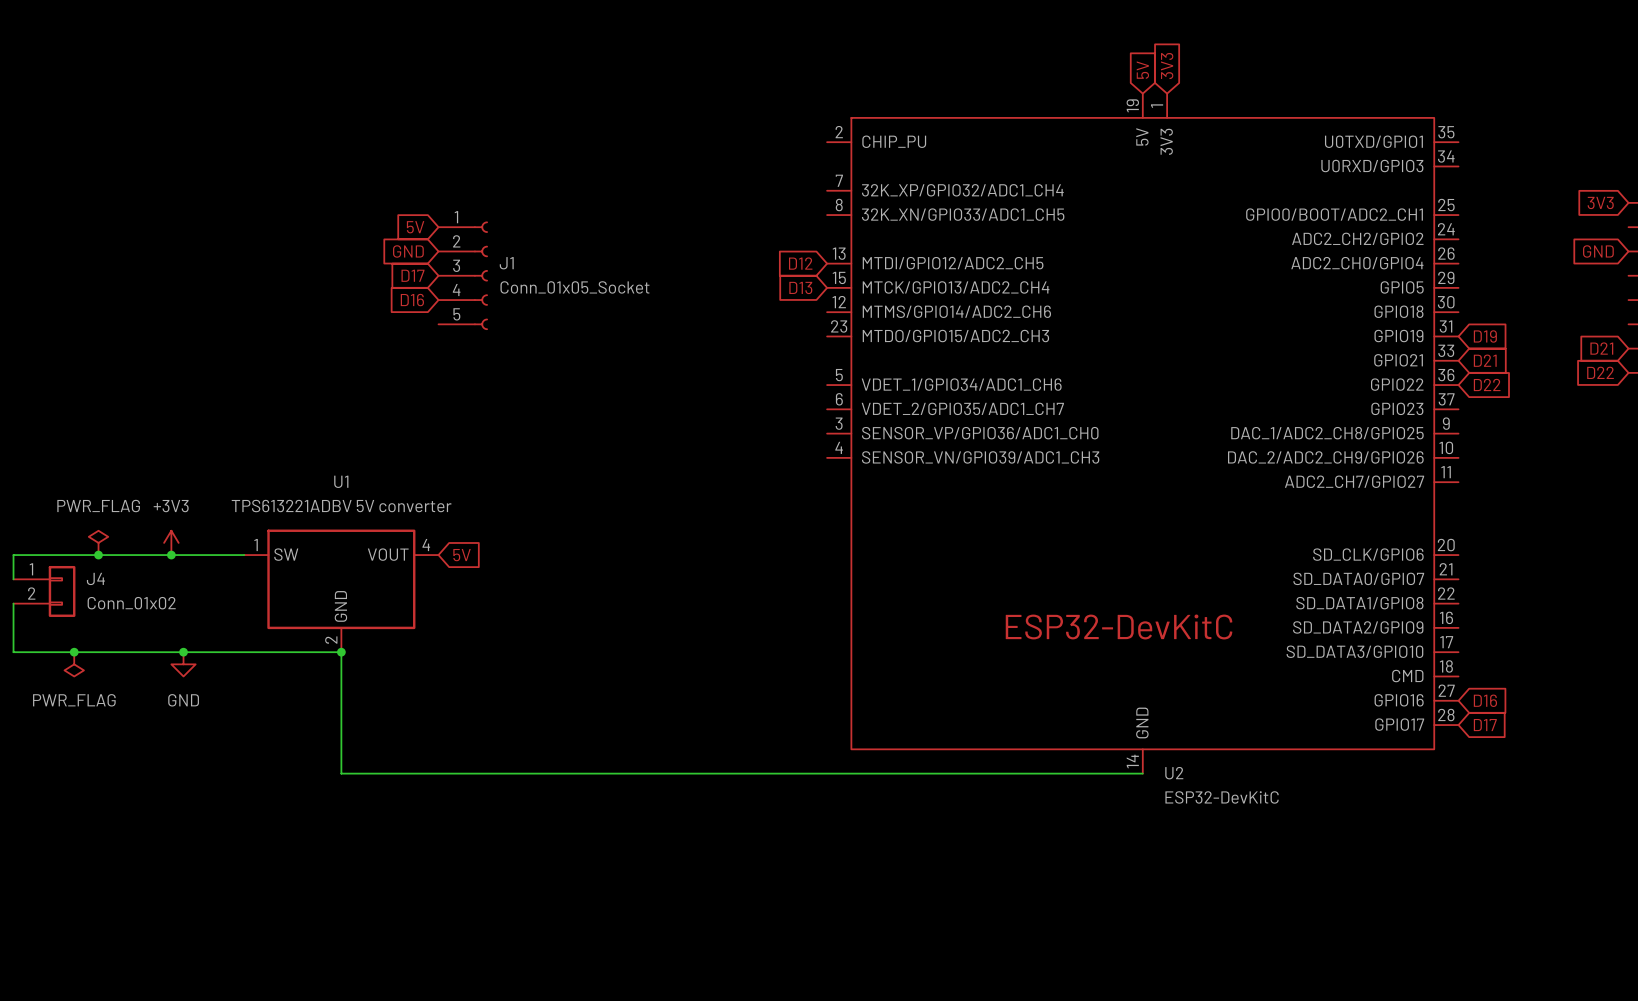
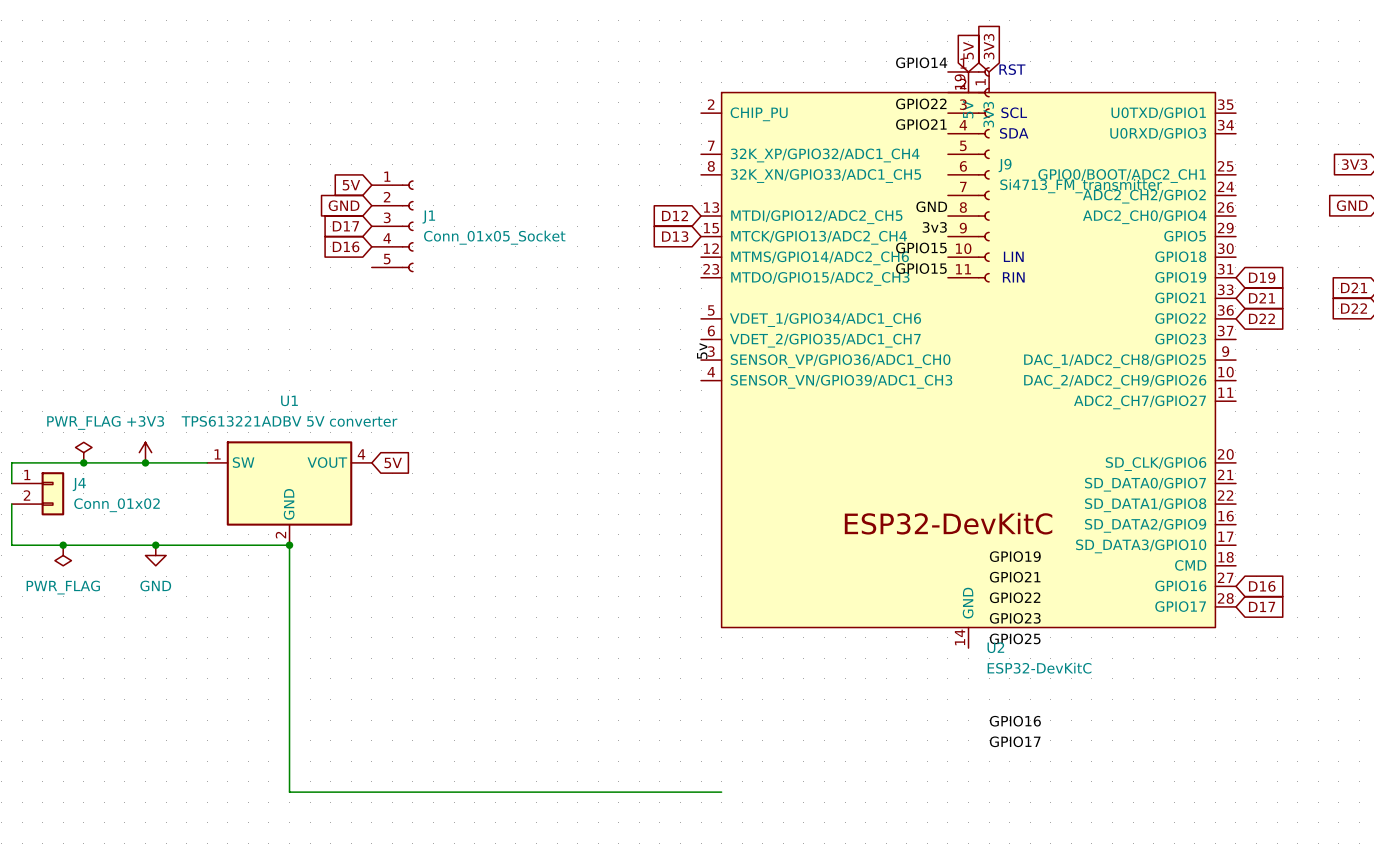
label: none -> GPIO14 (921, 62)
text: none -> RST (1012, 69)
label: none -> GPIO22 (921, 103)
text: none -> SCL (1014, 112)
label: none -> GPIO21 (921, 124)
text: none -> SDA (1014, 133)
J9: none -> Si4713_FM_transmitter (968, 174)
label: none -> GND (931, 206)
label: none -> 3v3 (934, 227)
label: none -> GPIO15 (921, 247)
text: none -> LIN (1013, 256)
label: none -> GPIO15 (921, 268)
text: none -> RIN (1013, 277)
label: none -> 5v (702, 351)
label: none -> GPIO19 (1015, 556)
label: none -> GPIO21 (1015, 577)
label: none -> GPIO22 (1015, 597)
label: none -> GPIO23 (1015, 618)
label: none -> GPIO25 (1015, 638)
wire: (341, 773) (1142, 773) -> (289, 648) (289, 792) (721, 792)
label: none -> GPIO16 (1015, 721)
label: none -> GPIO17 (1015, 741)

